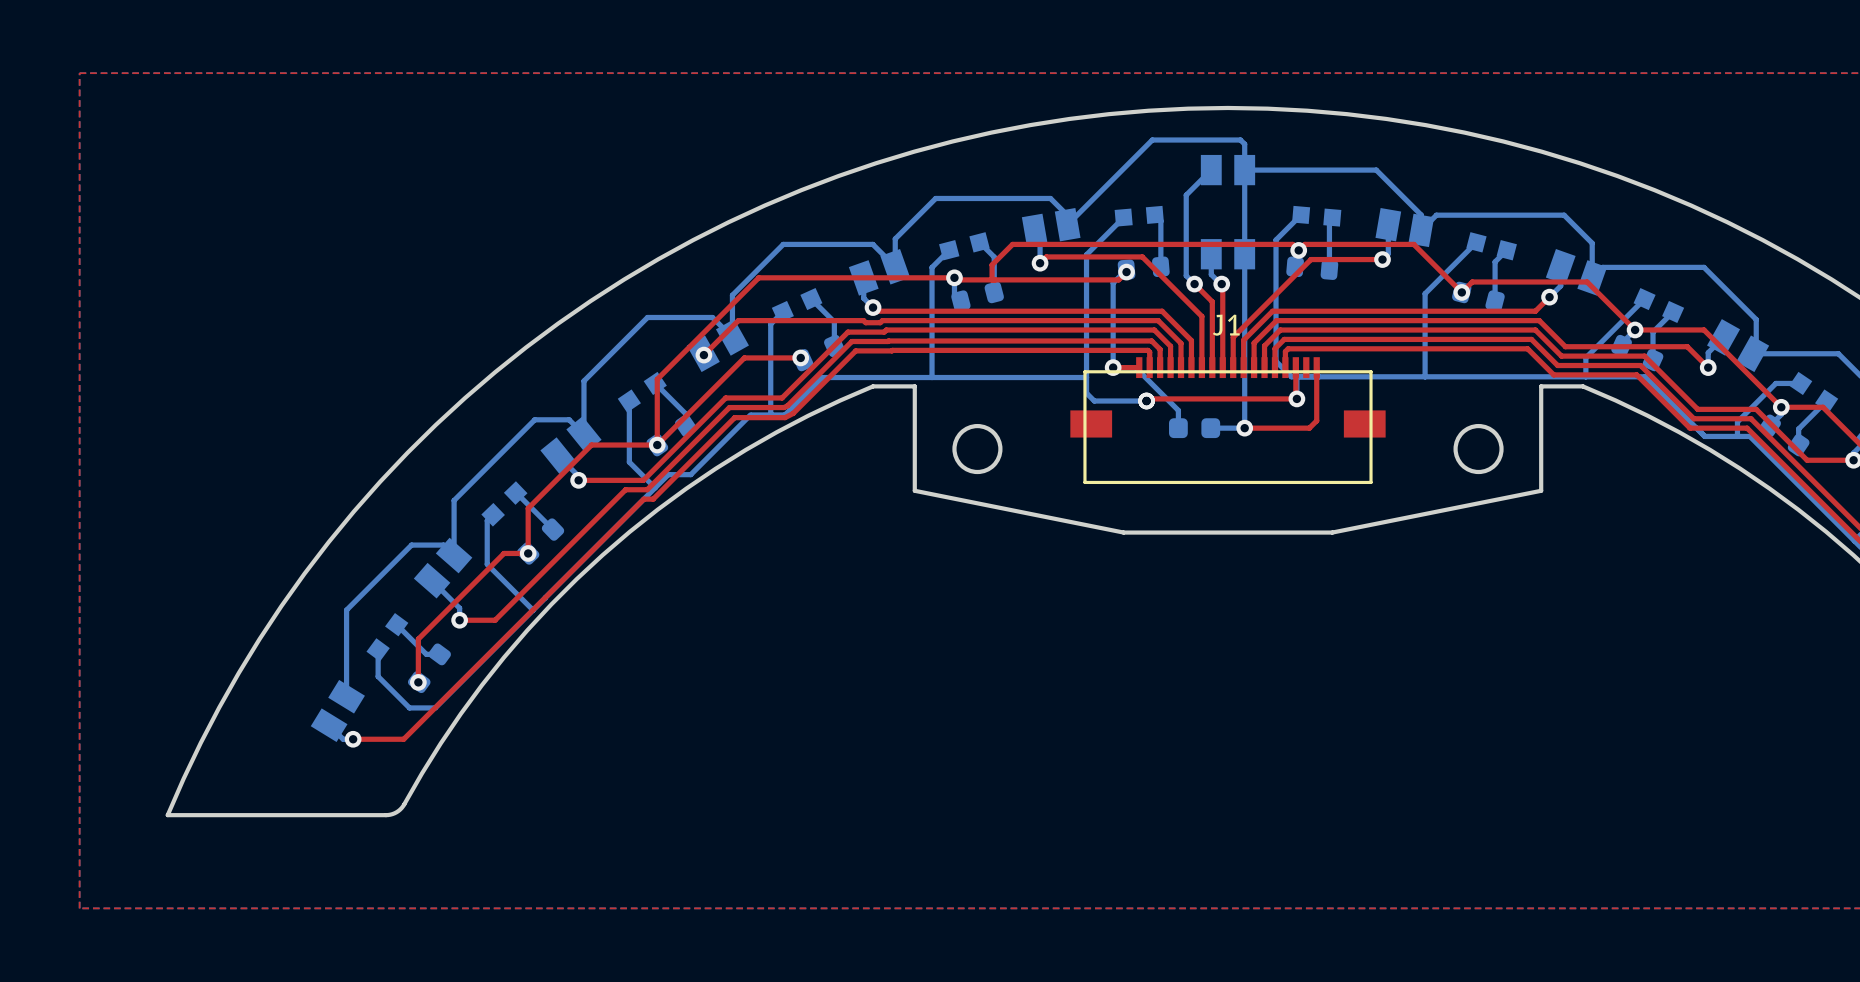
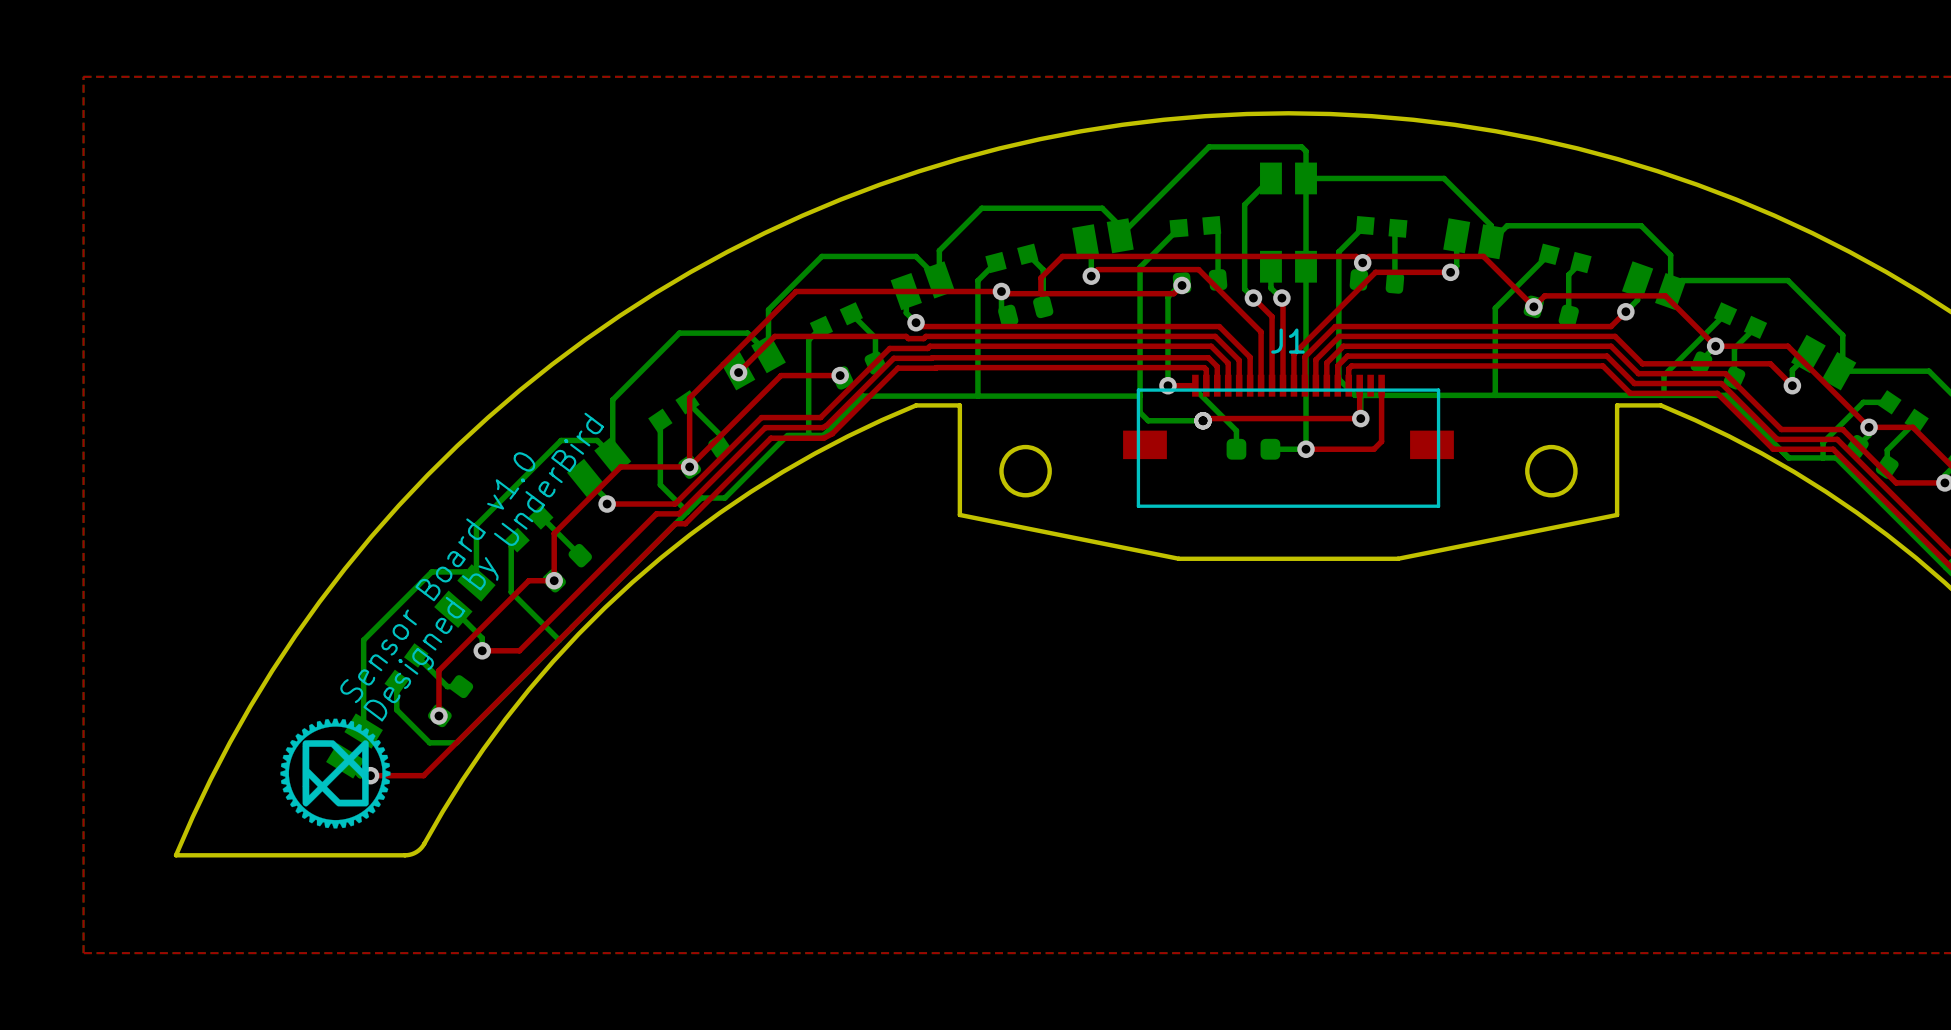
text: none -> Designed by UnderBird (483, 567)
text: none -> Sensor Board v1.0 (437, 577)
drawing: none -> [280, 718, 391, 829]

